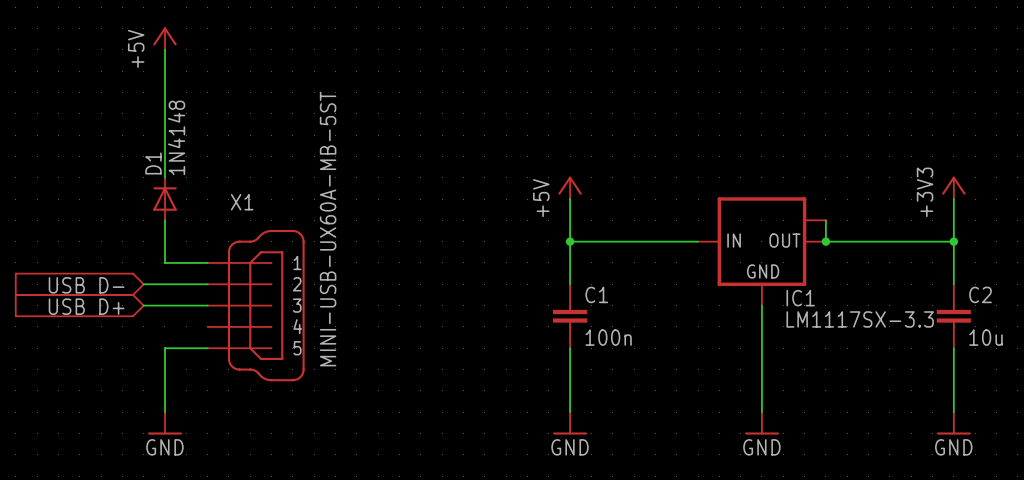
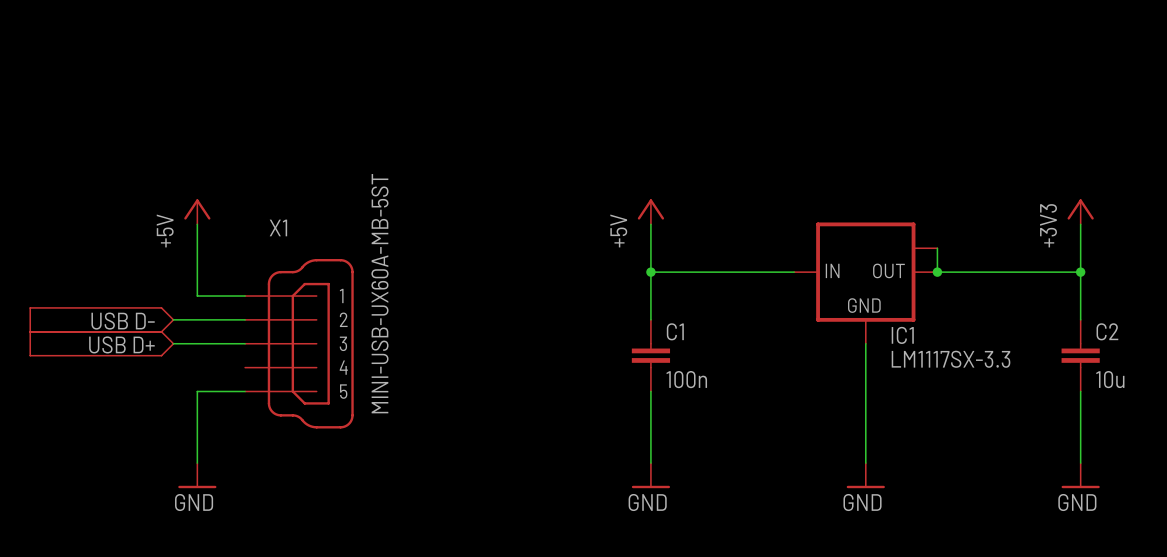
power symbol position: +5V (164, 38) -> +5V (197, 211)
wire: (164, 49) (164, 177) -> none
D1: 1N4148 (164, 199) -> none

